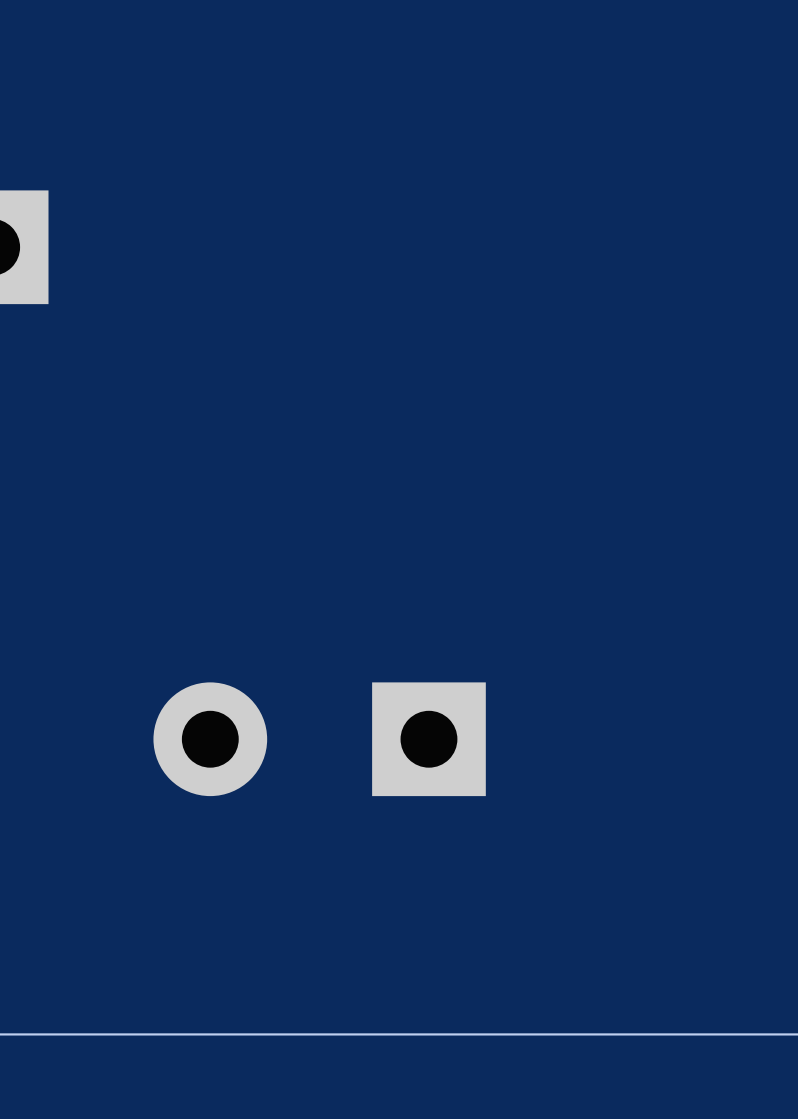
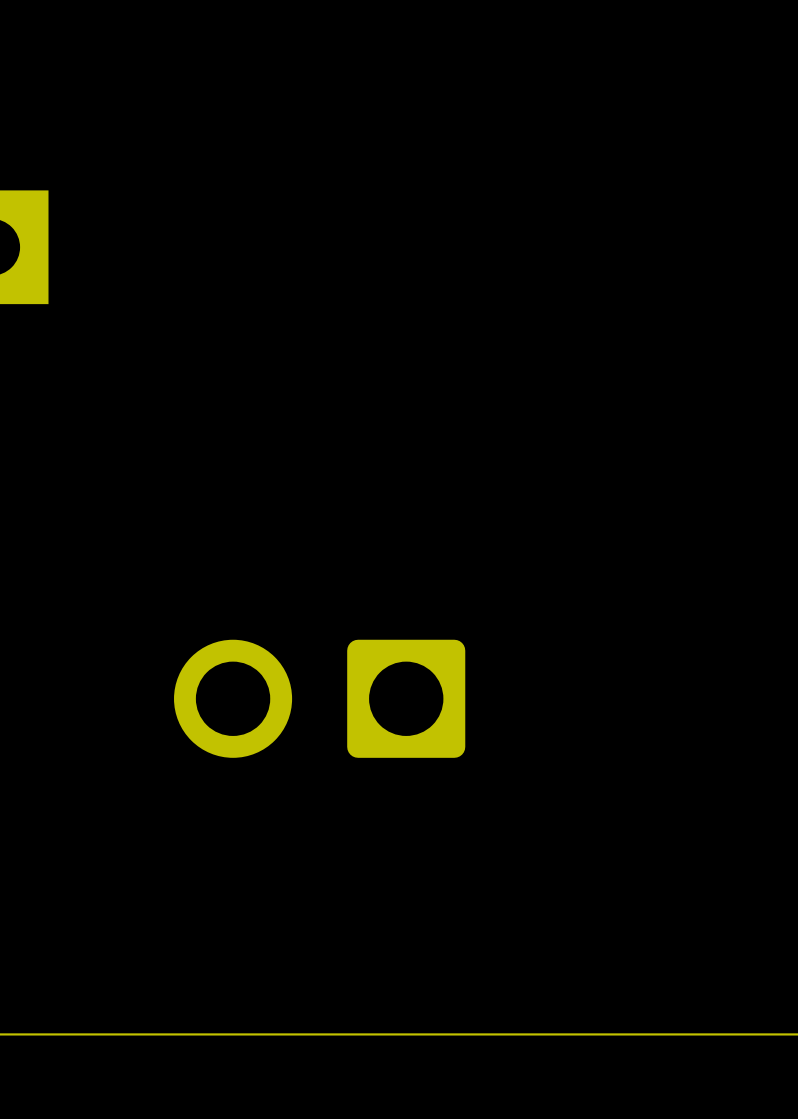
part footprint: [153, 682, 486, 797] -> [174, 639, 466, 758]

